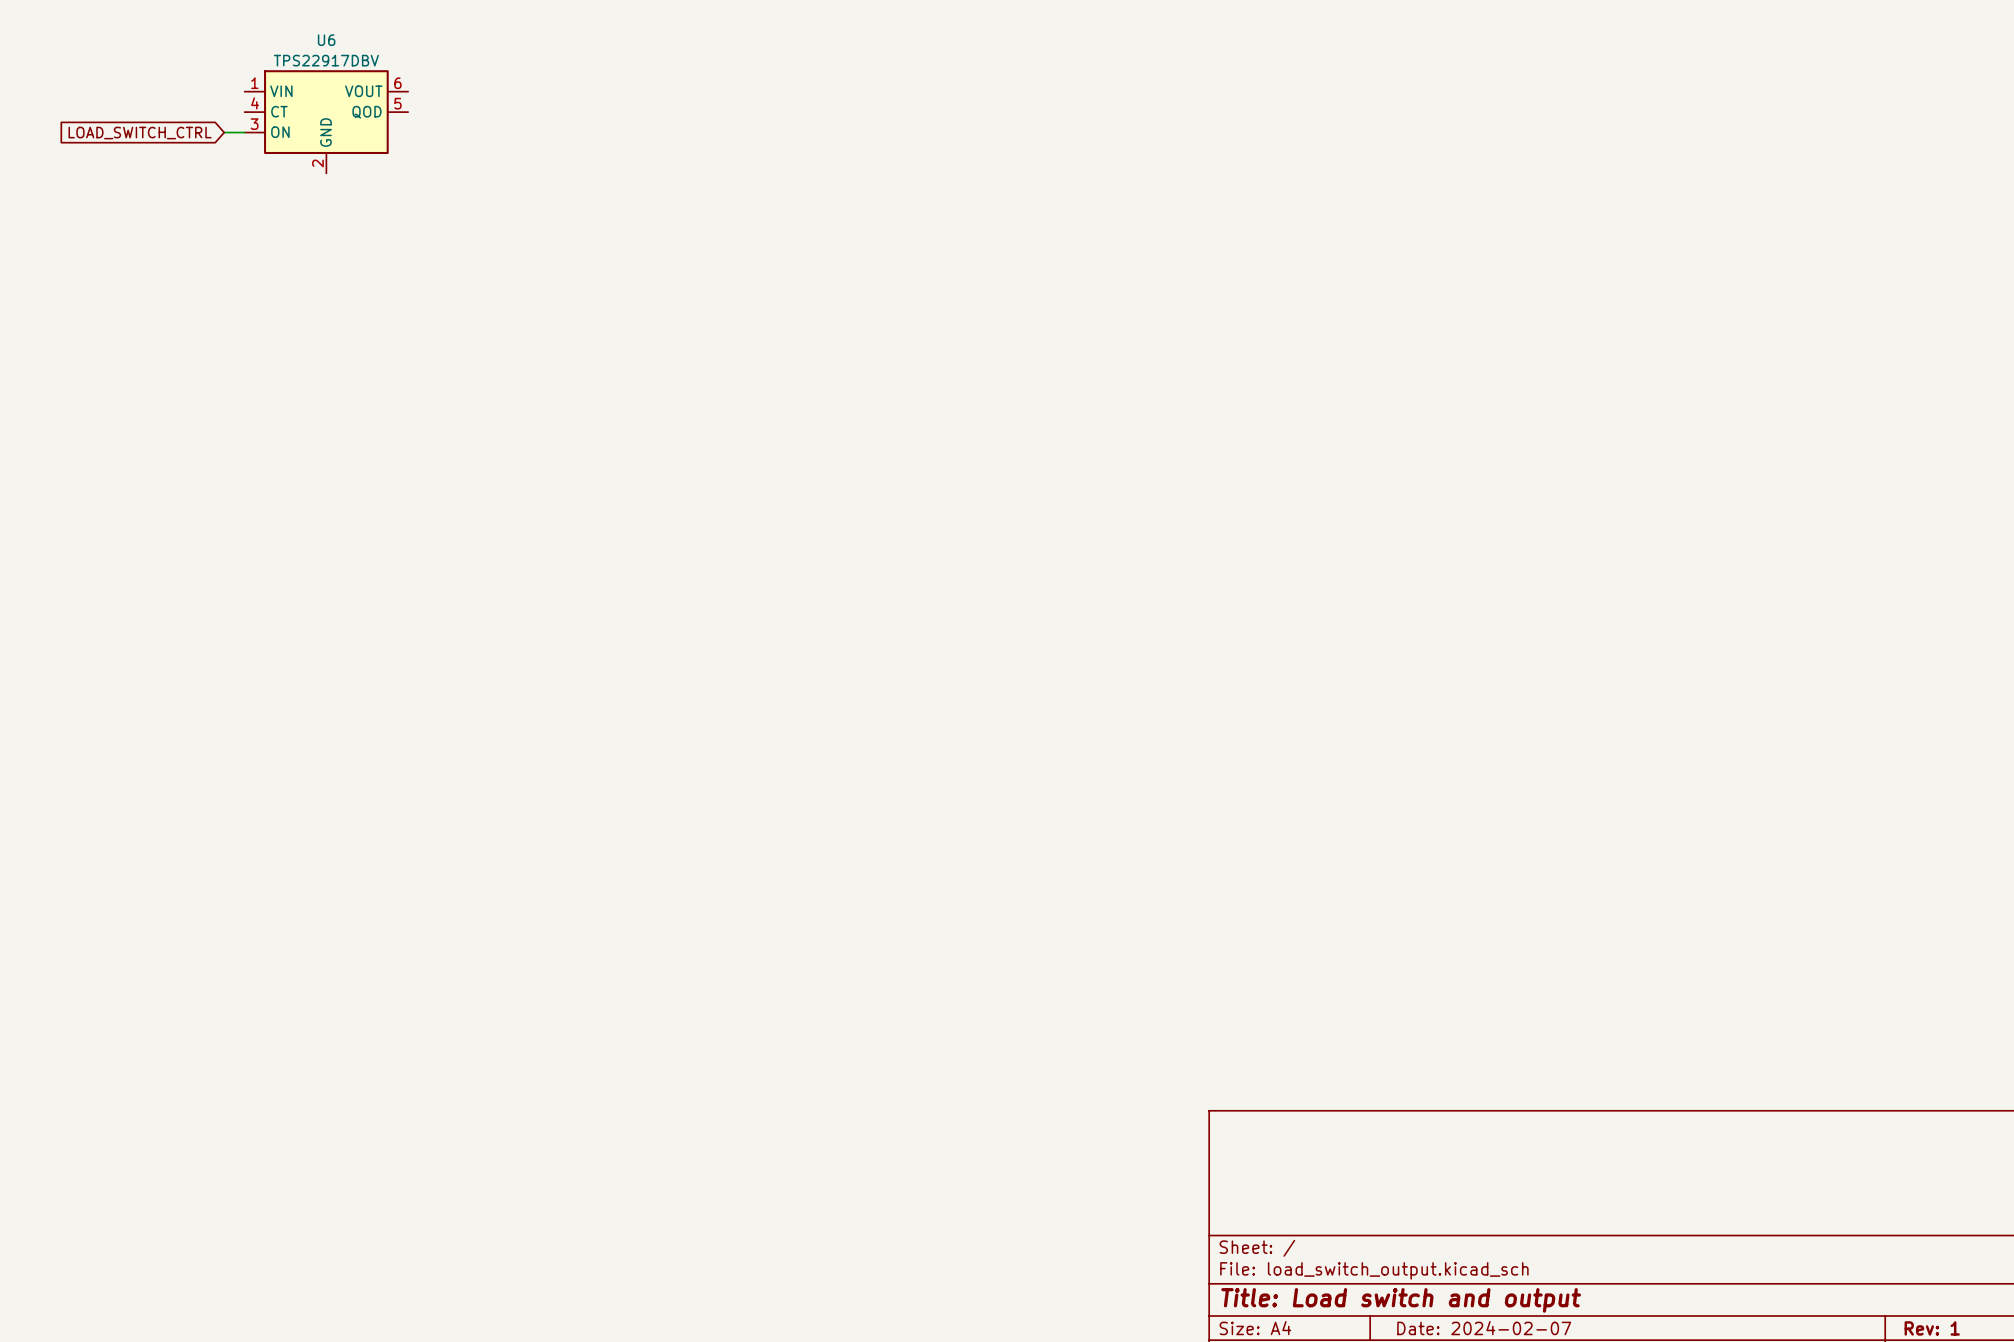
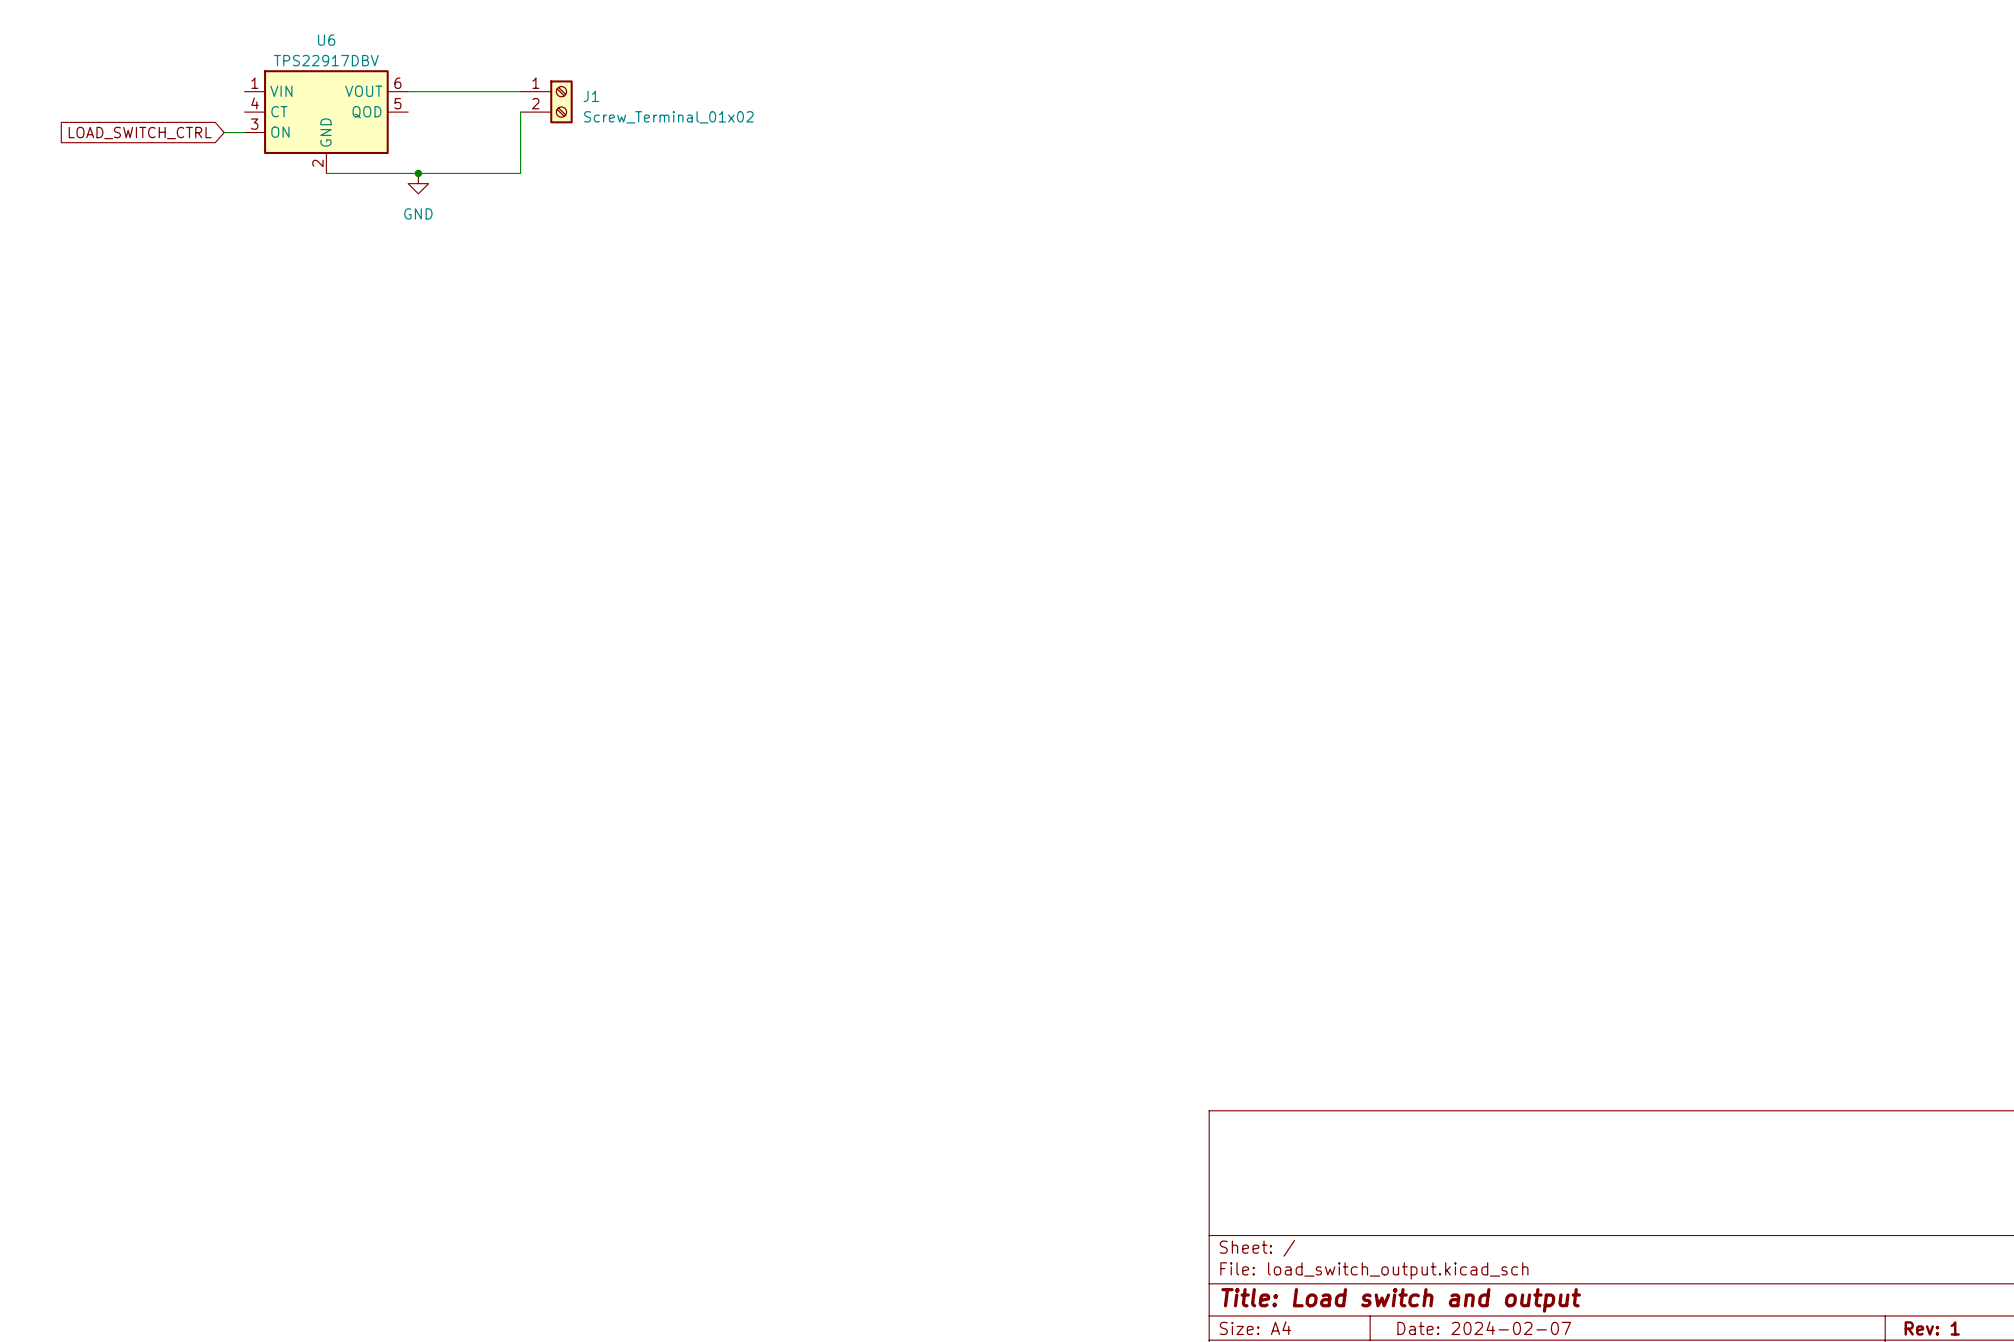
wire: none -> (408, 91) (520, 91)
J1: none -> Screw_Terminal_01x02 (546, 101)
wire: none -> (520, 112) (520, 173) (326, 173)
junction: none -> (418, 173)
power symbol: none -> GND (418, 183)

